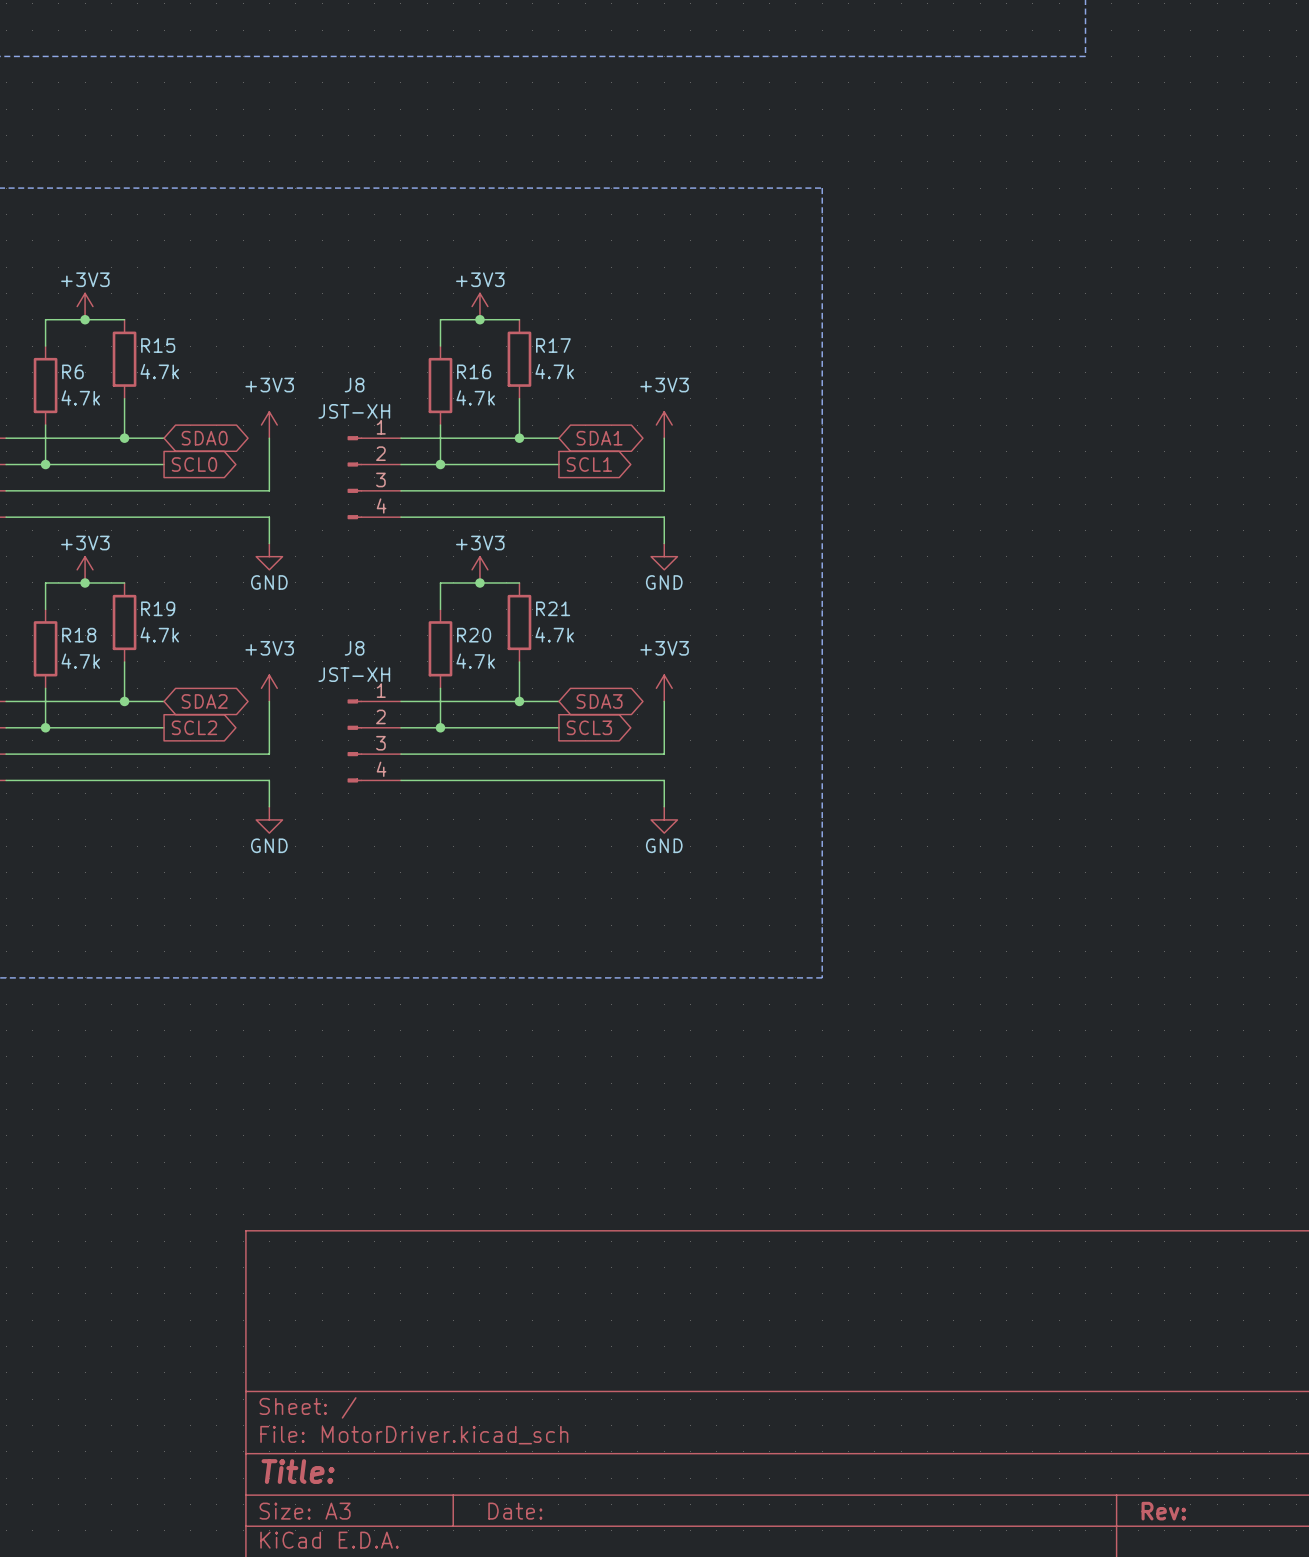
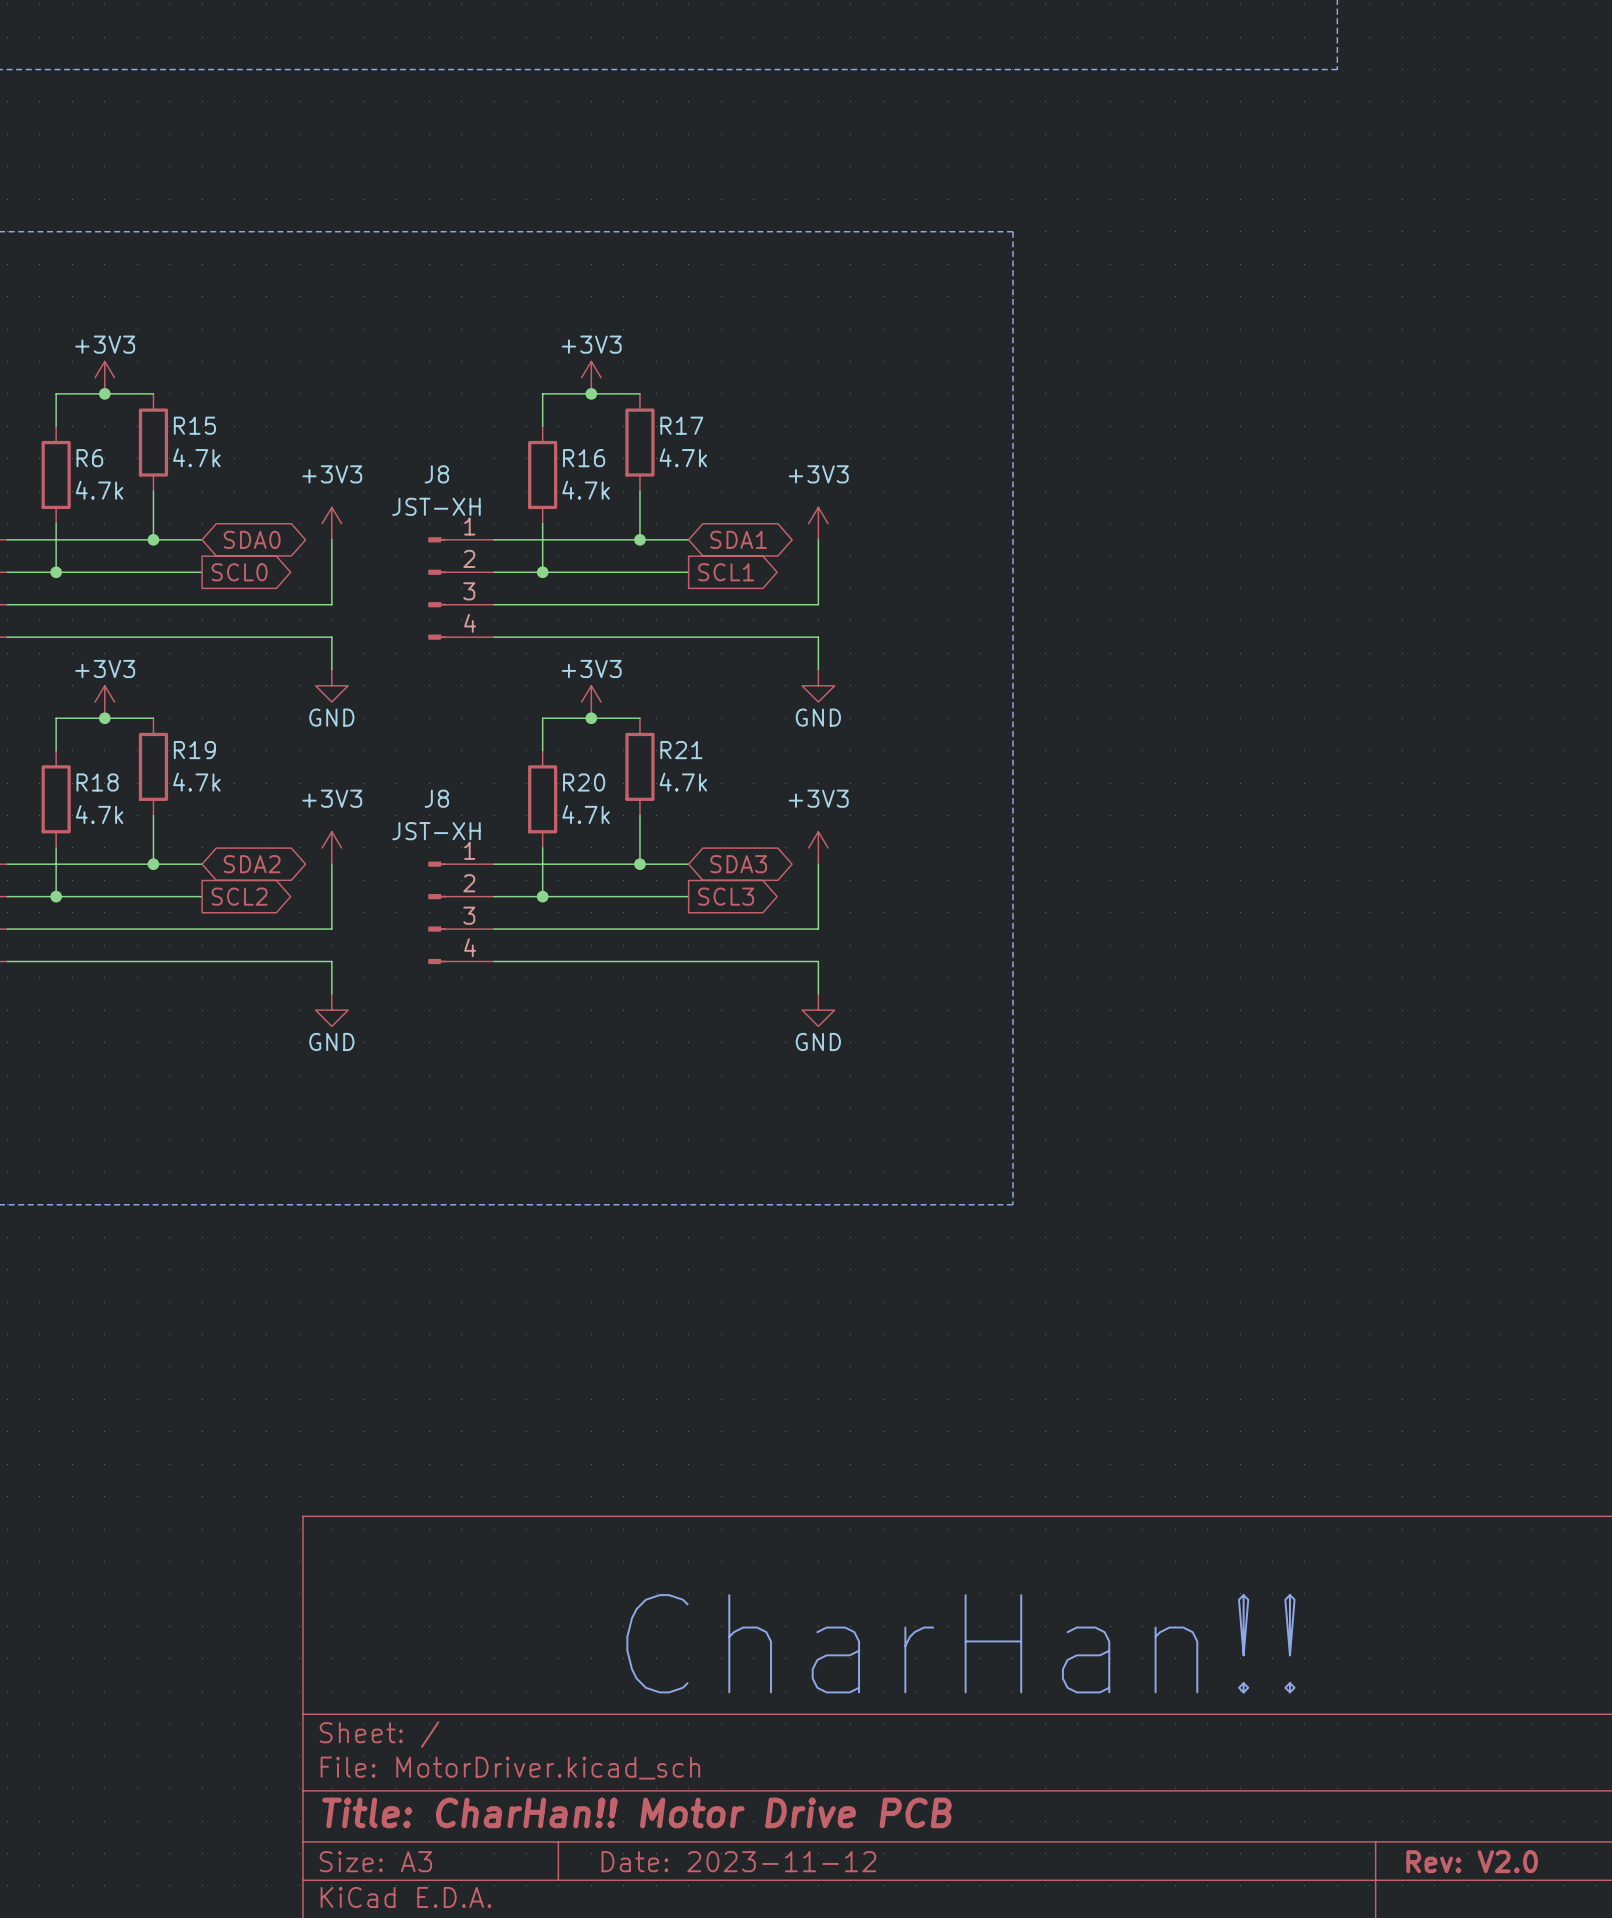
text: none -> CharHan!! (960, 1643)
title block: Title: (298, 1471) -> Title: CharHan!! Motor Drive PCB (636, 1812)
title block: Date: (515, 1511) -> Date: 2023-11-12 (738, 1861)
title block: Rev: (1163, 1511) -> Rev: V2.0 (1472, 1861)

